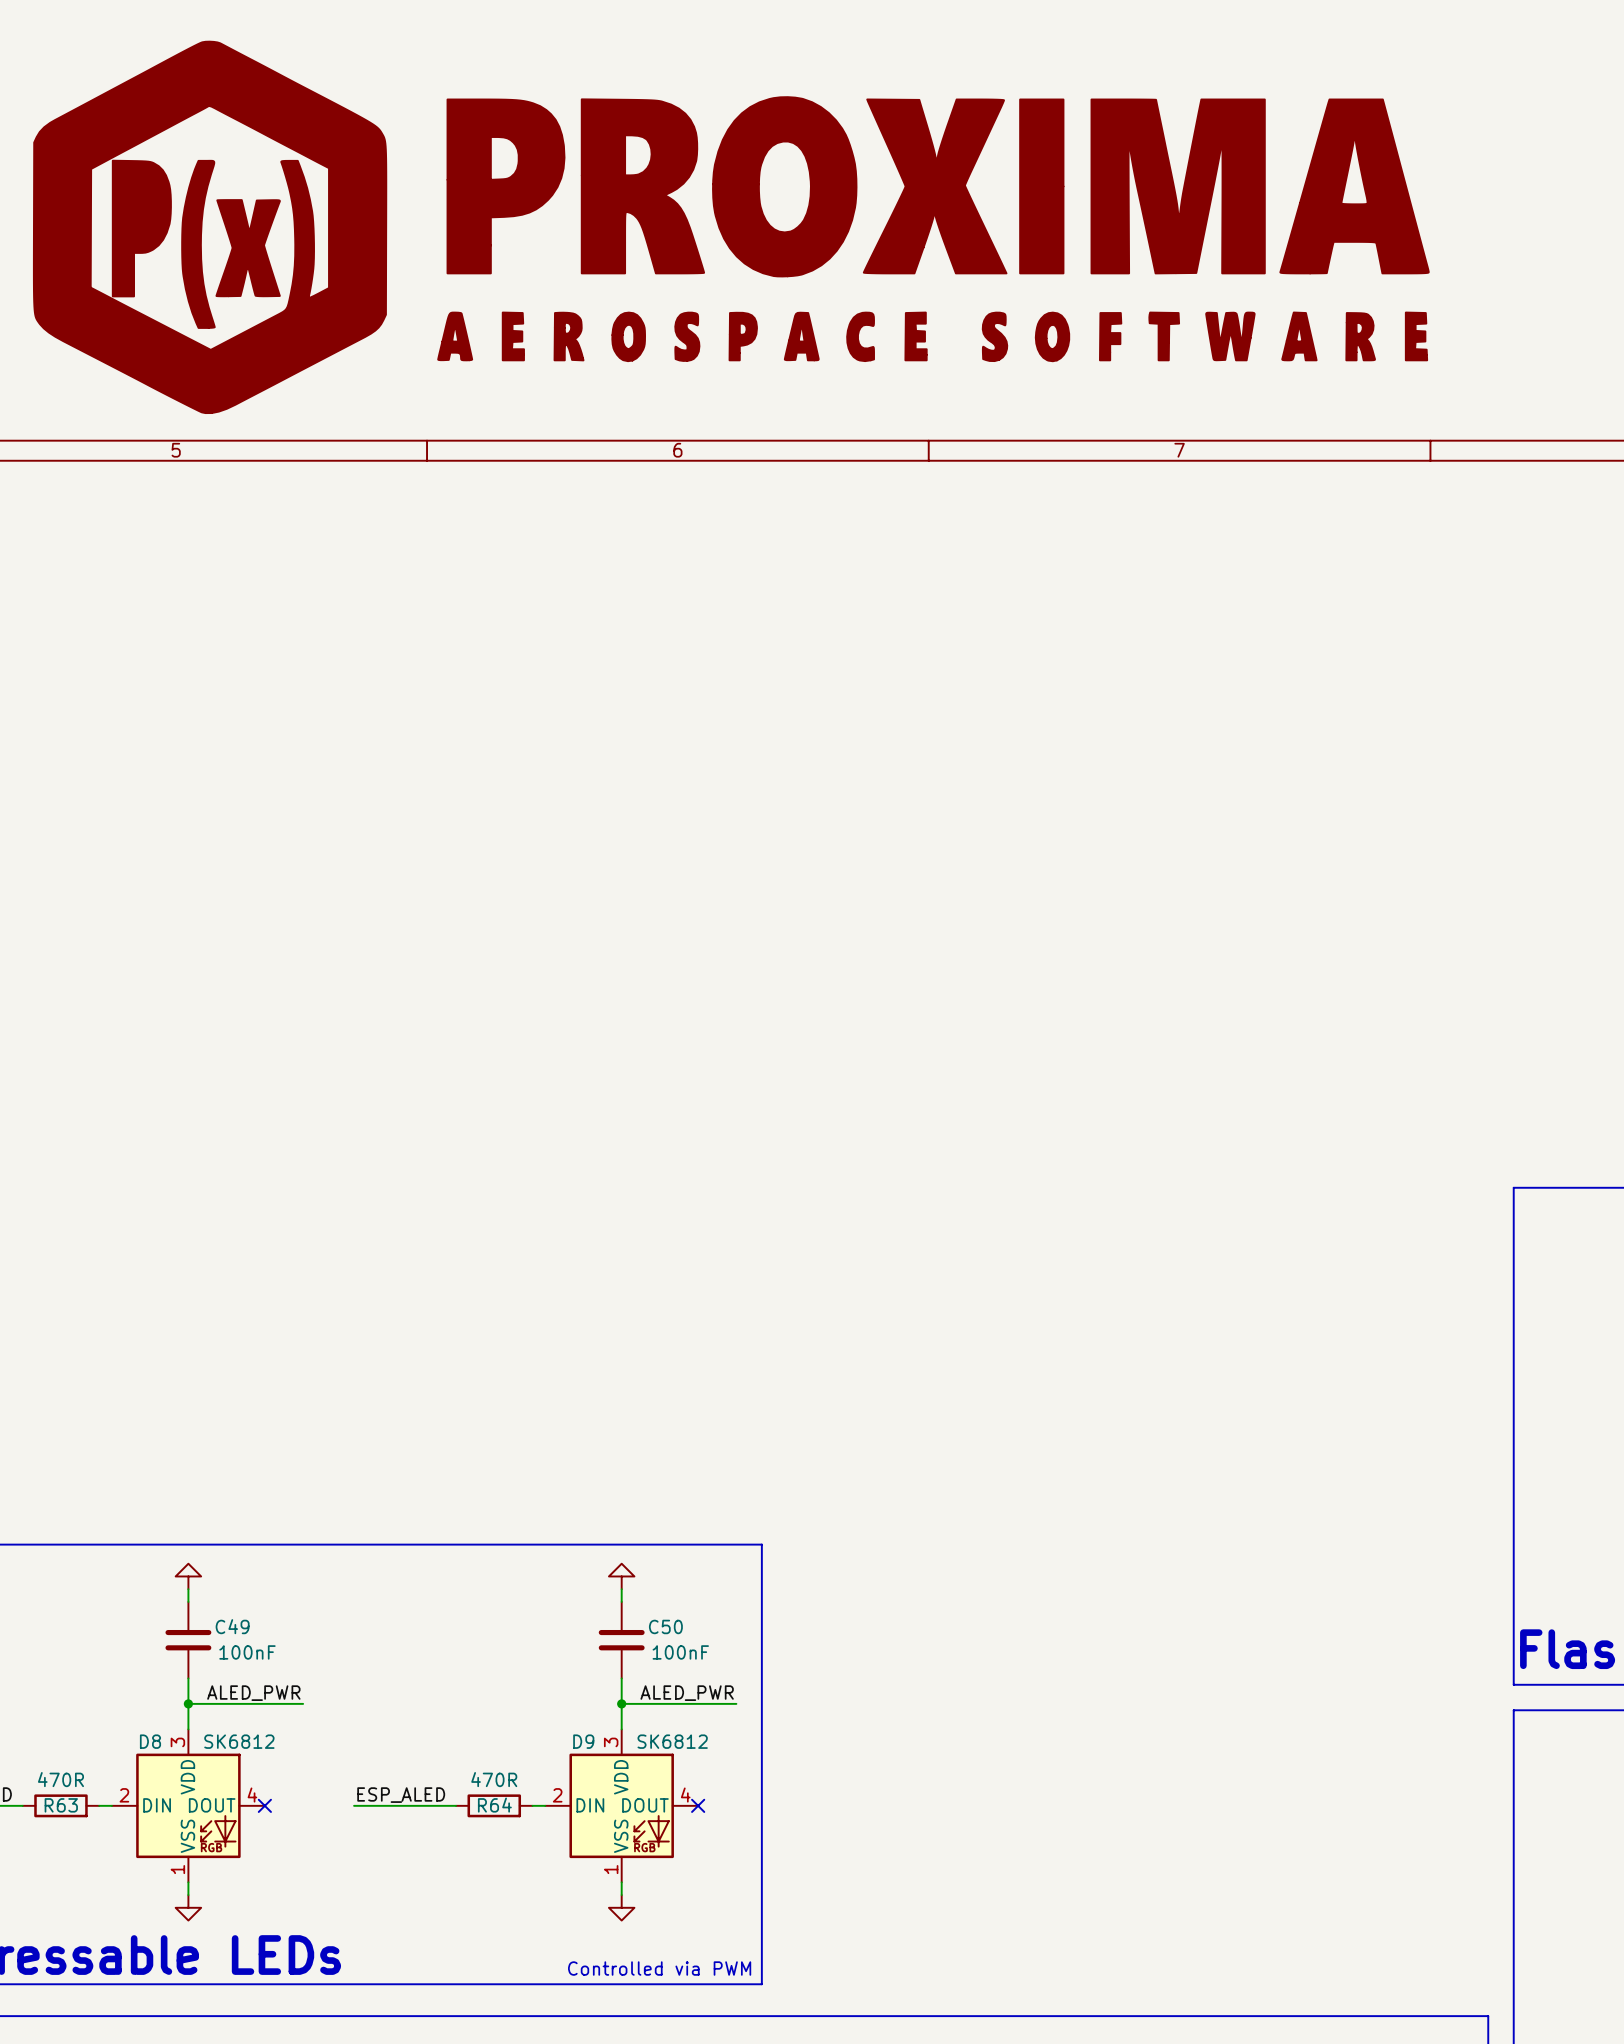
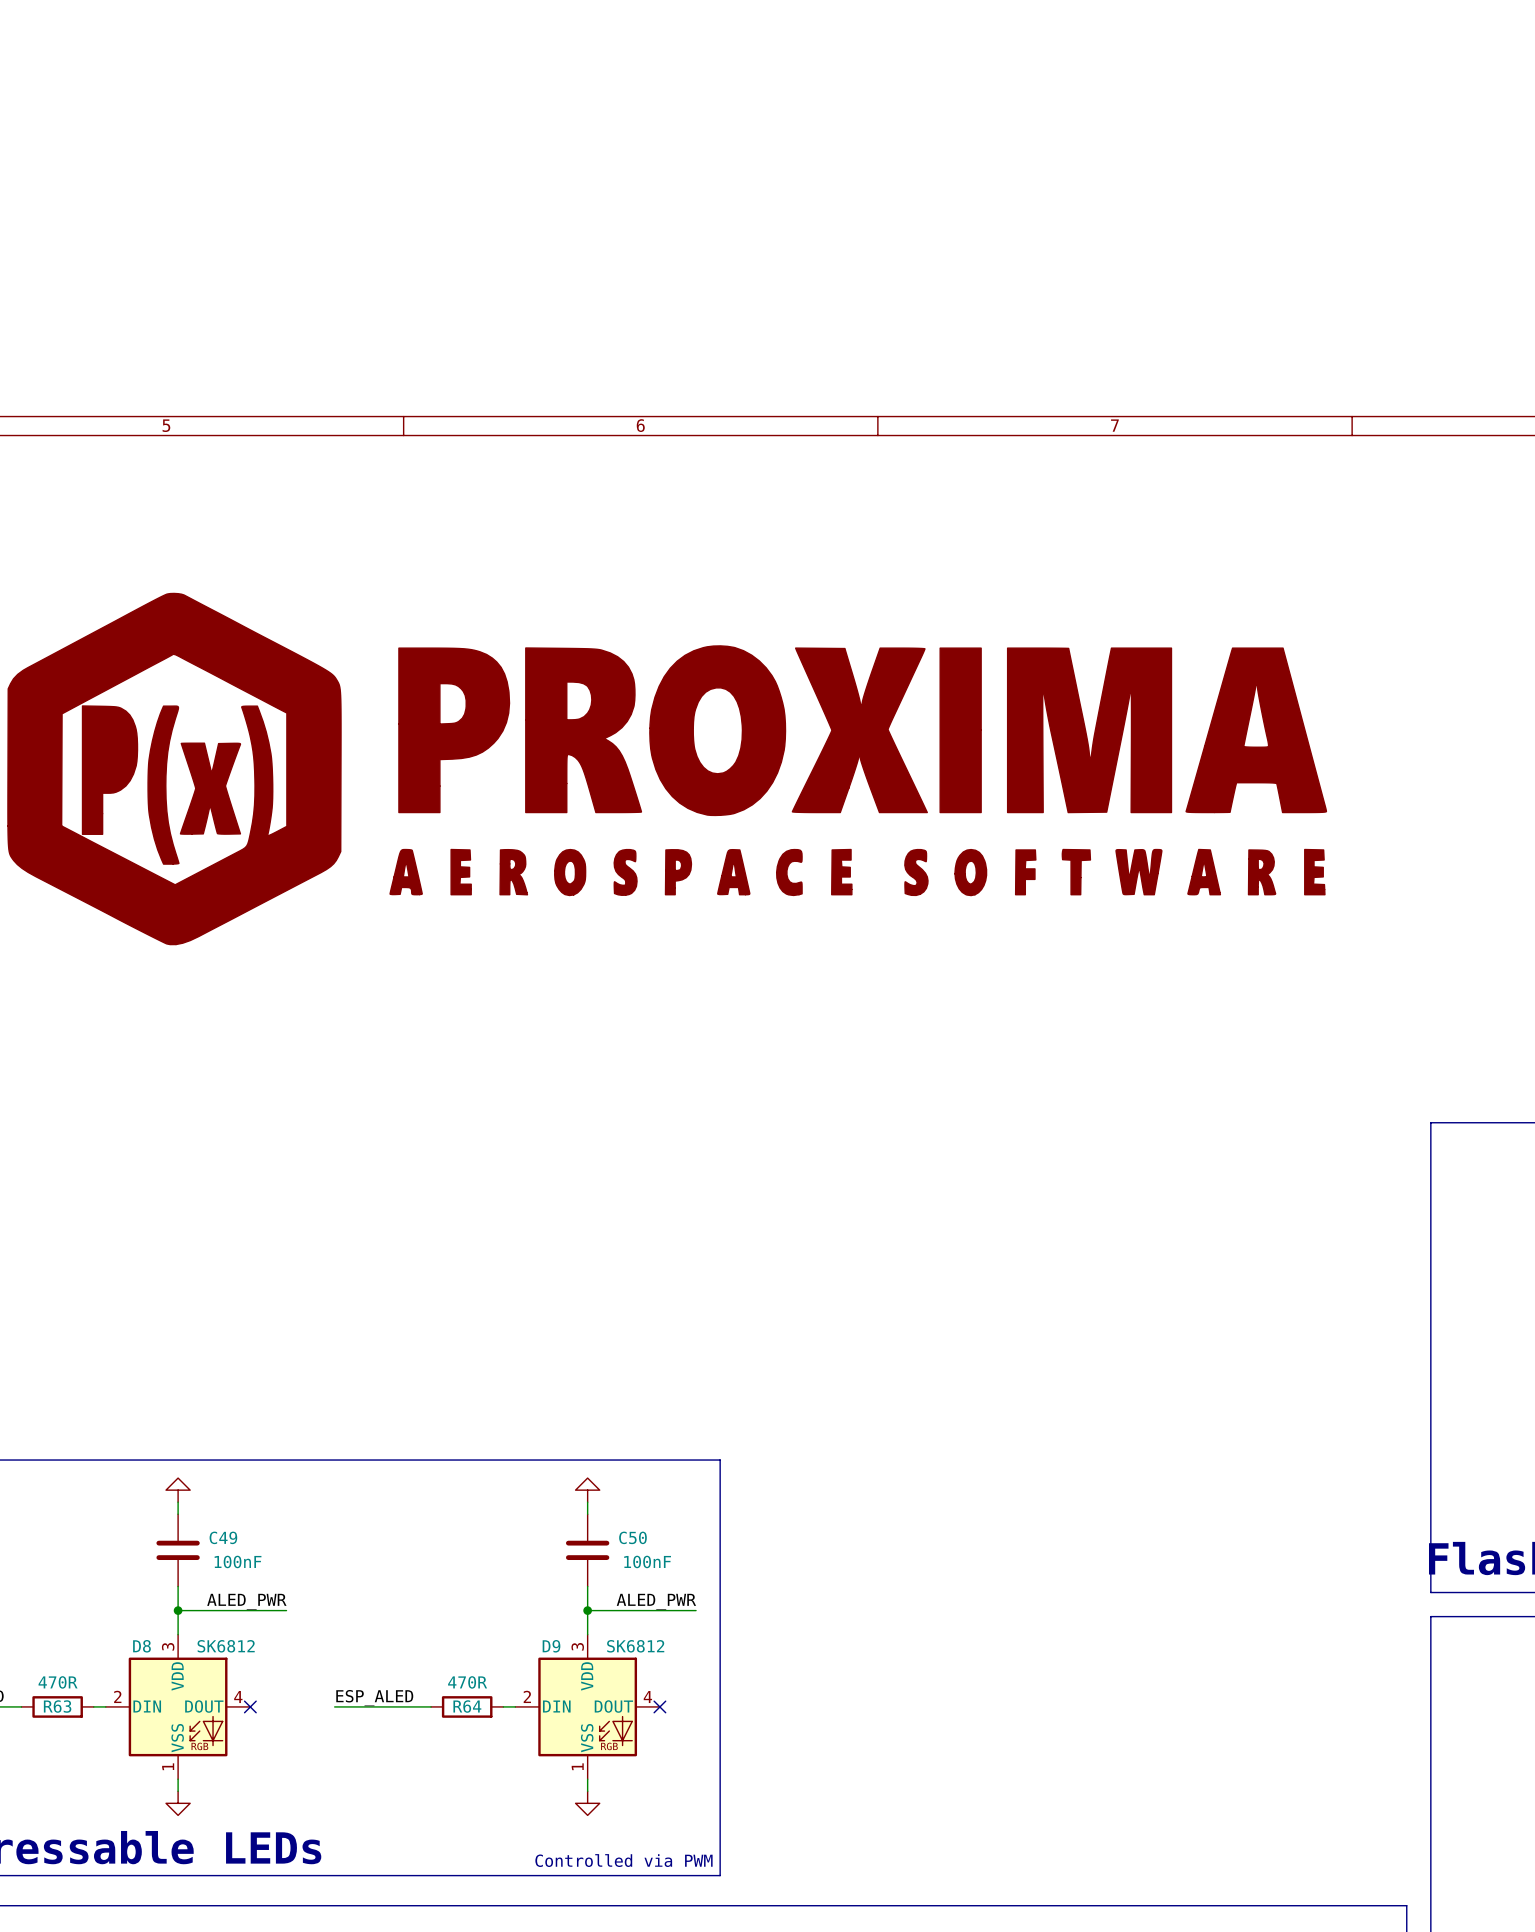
power symbol: (731, 227) -> none
power symbol: none -> (667, 769)

